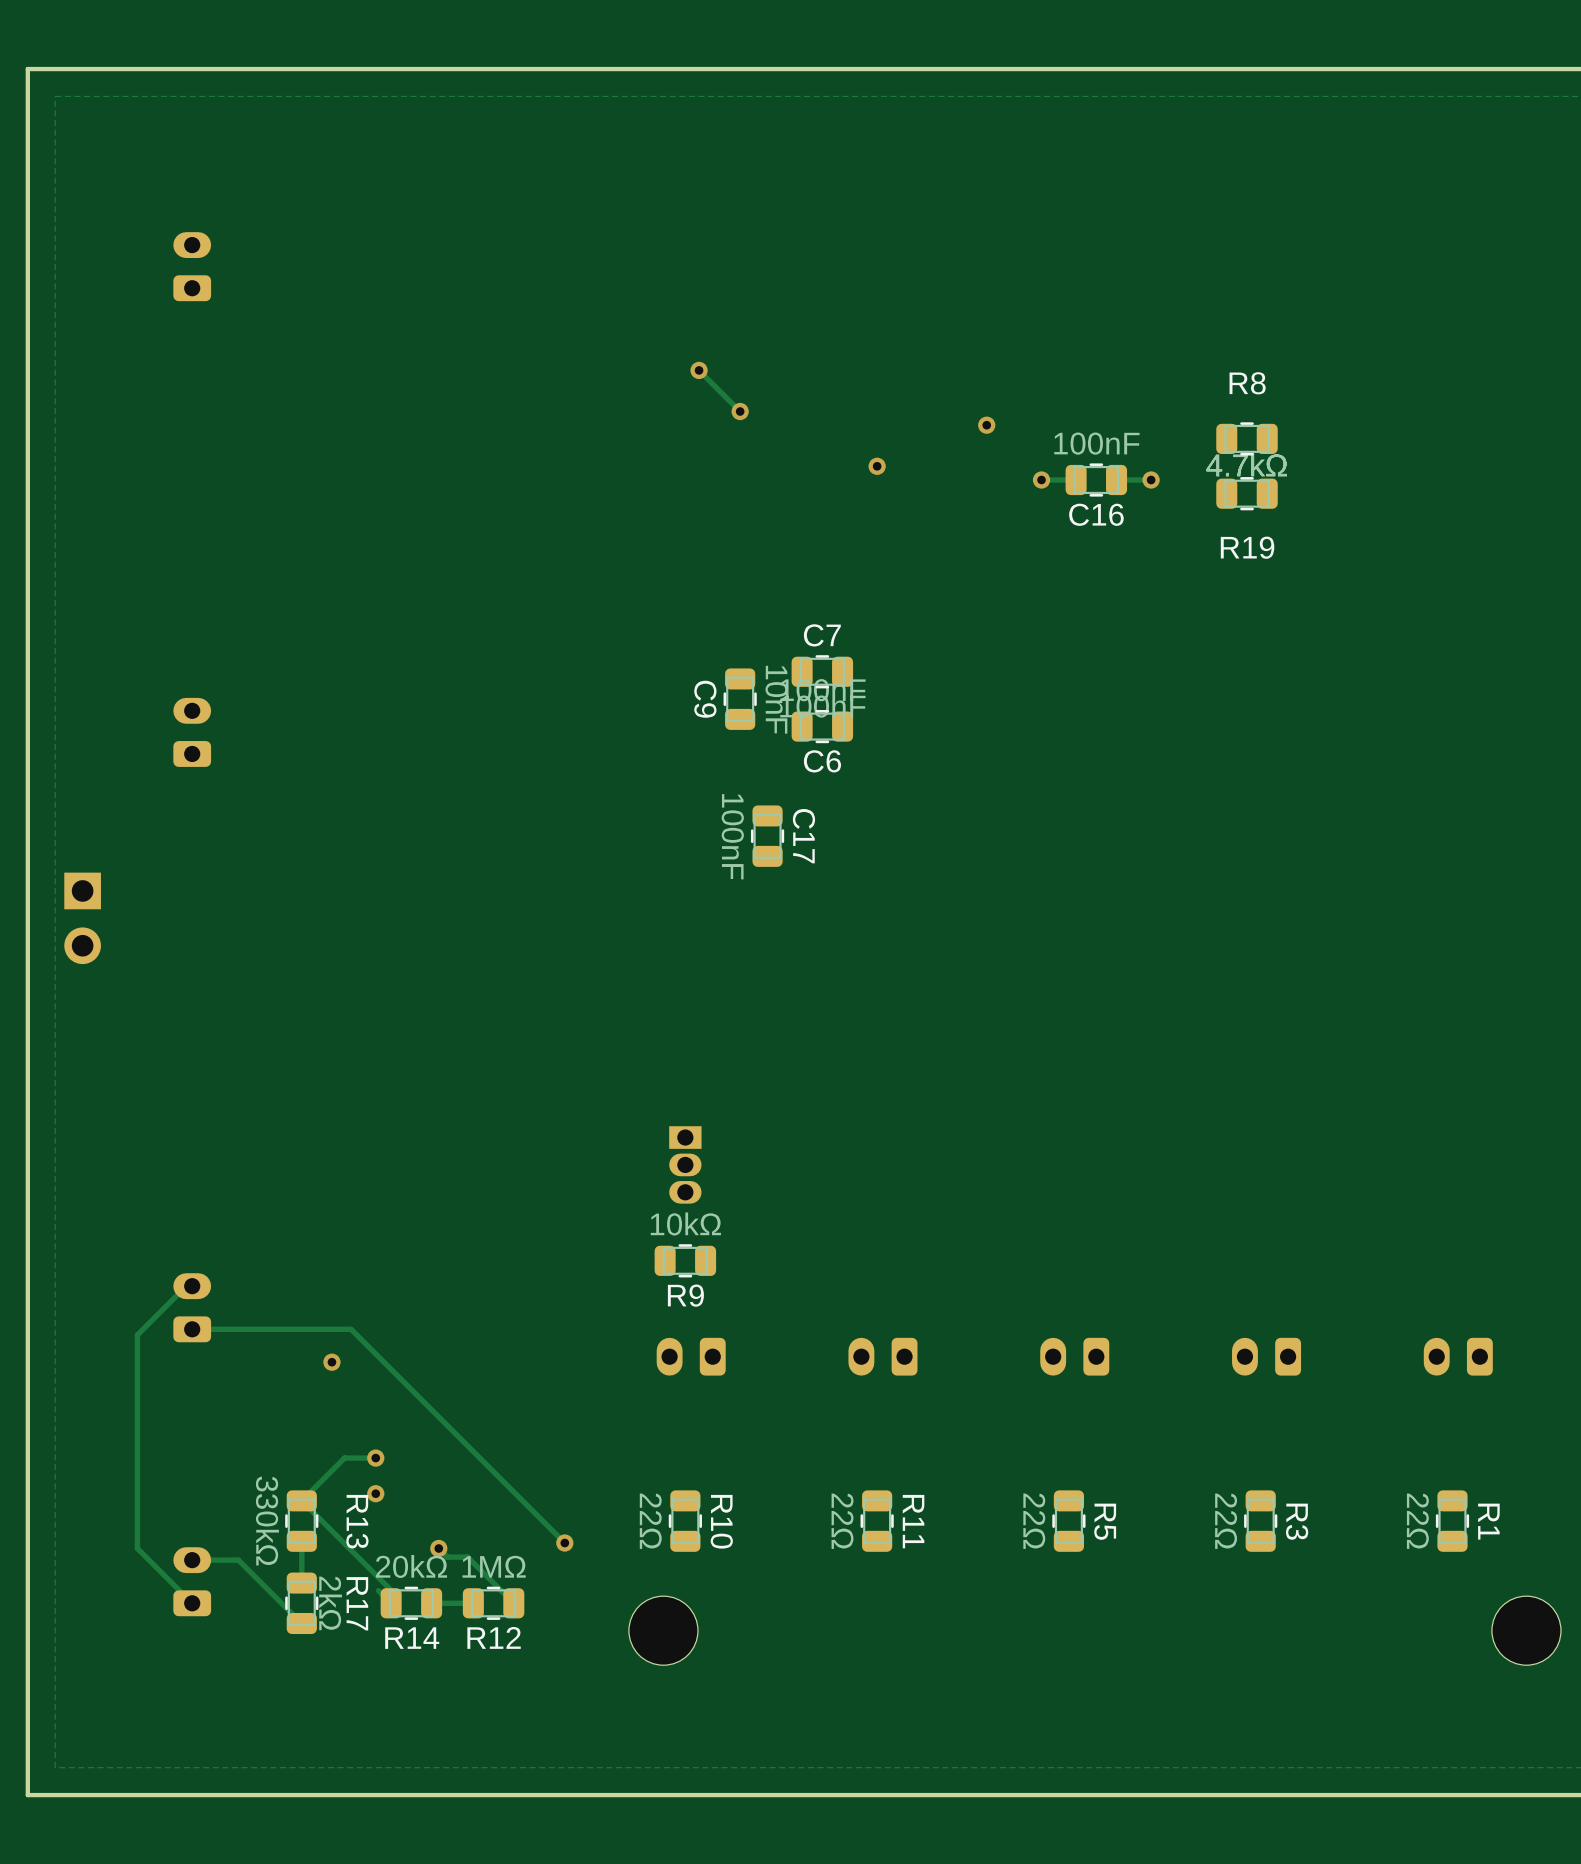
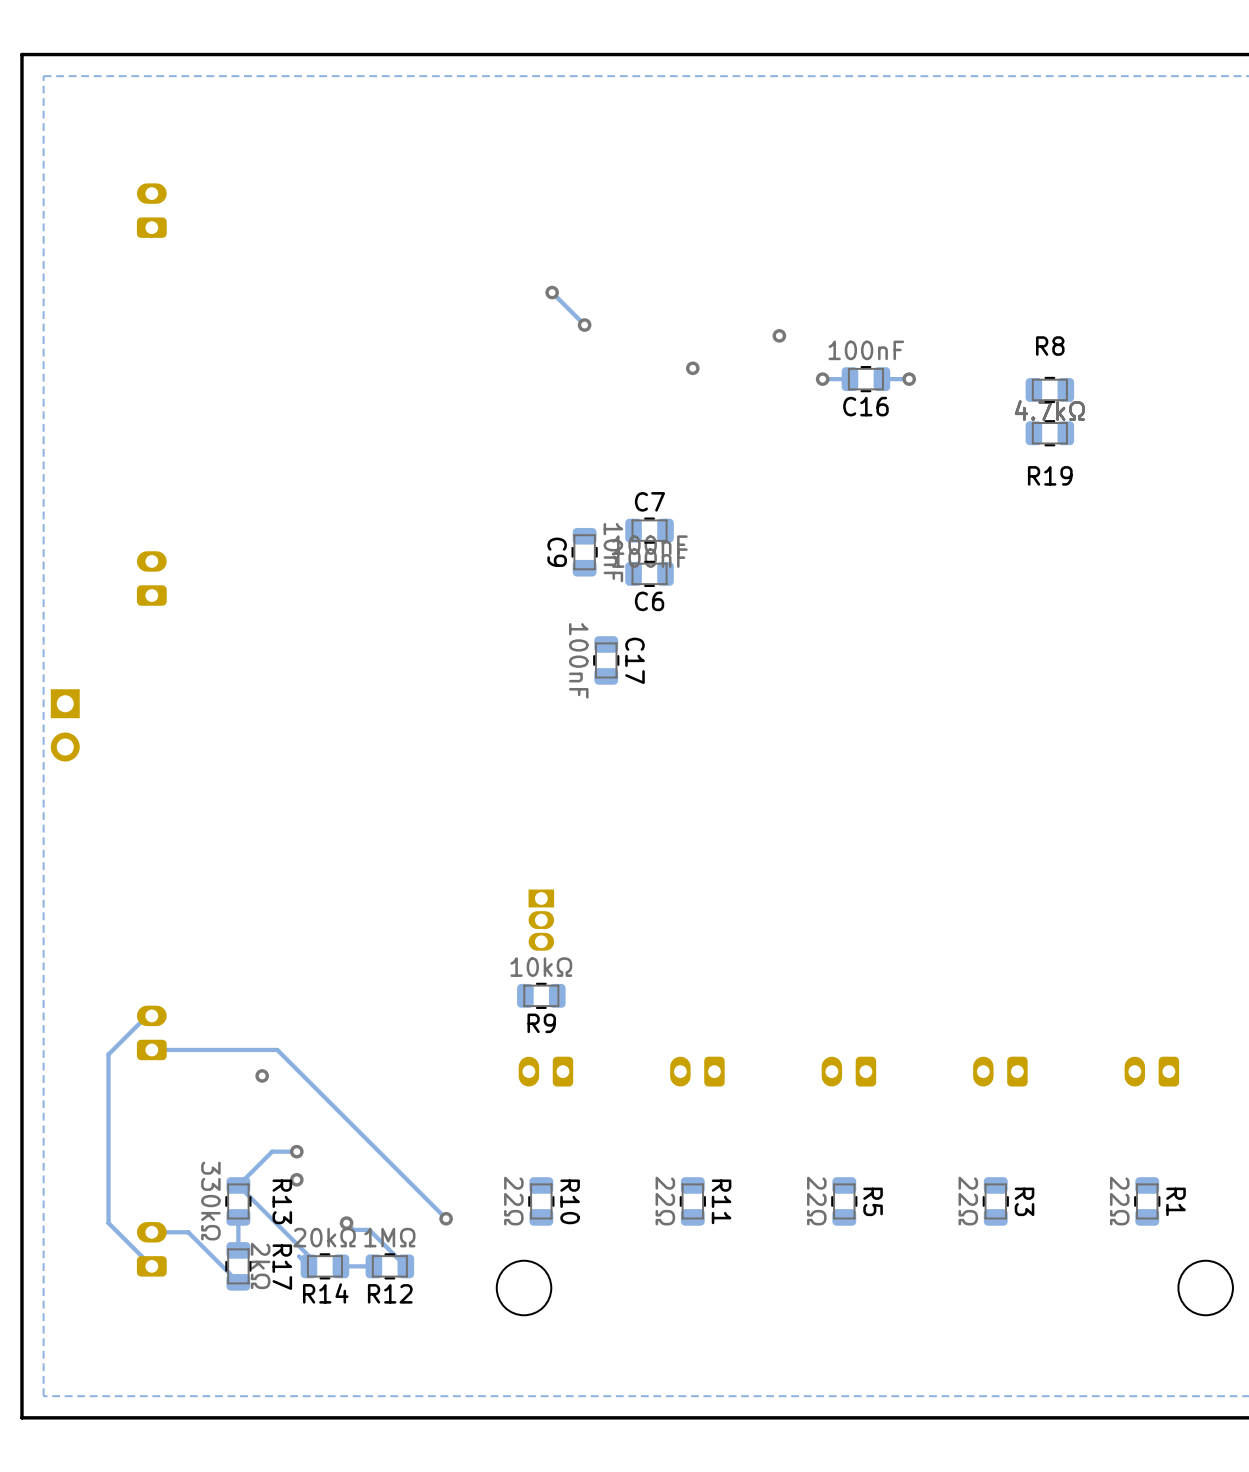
R8 position: (1247, 438) -> (1049, 389)
R19 position: (1247, 493) -> (1049, 433)

